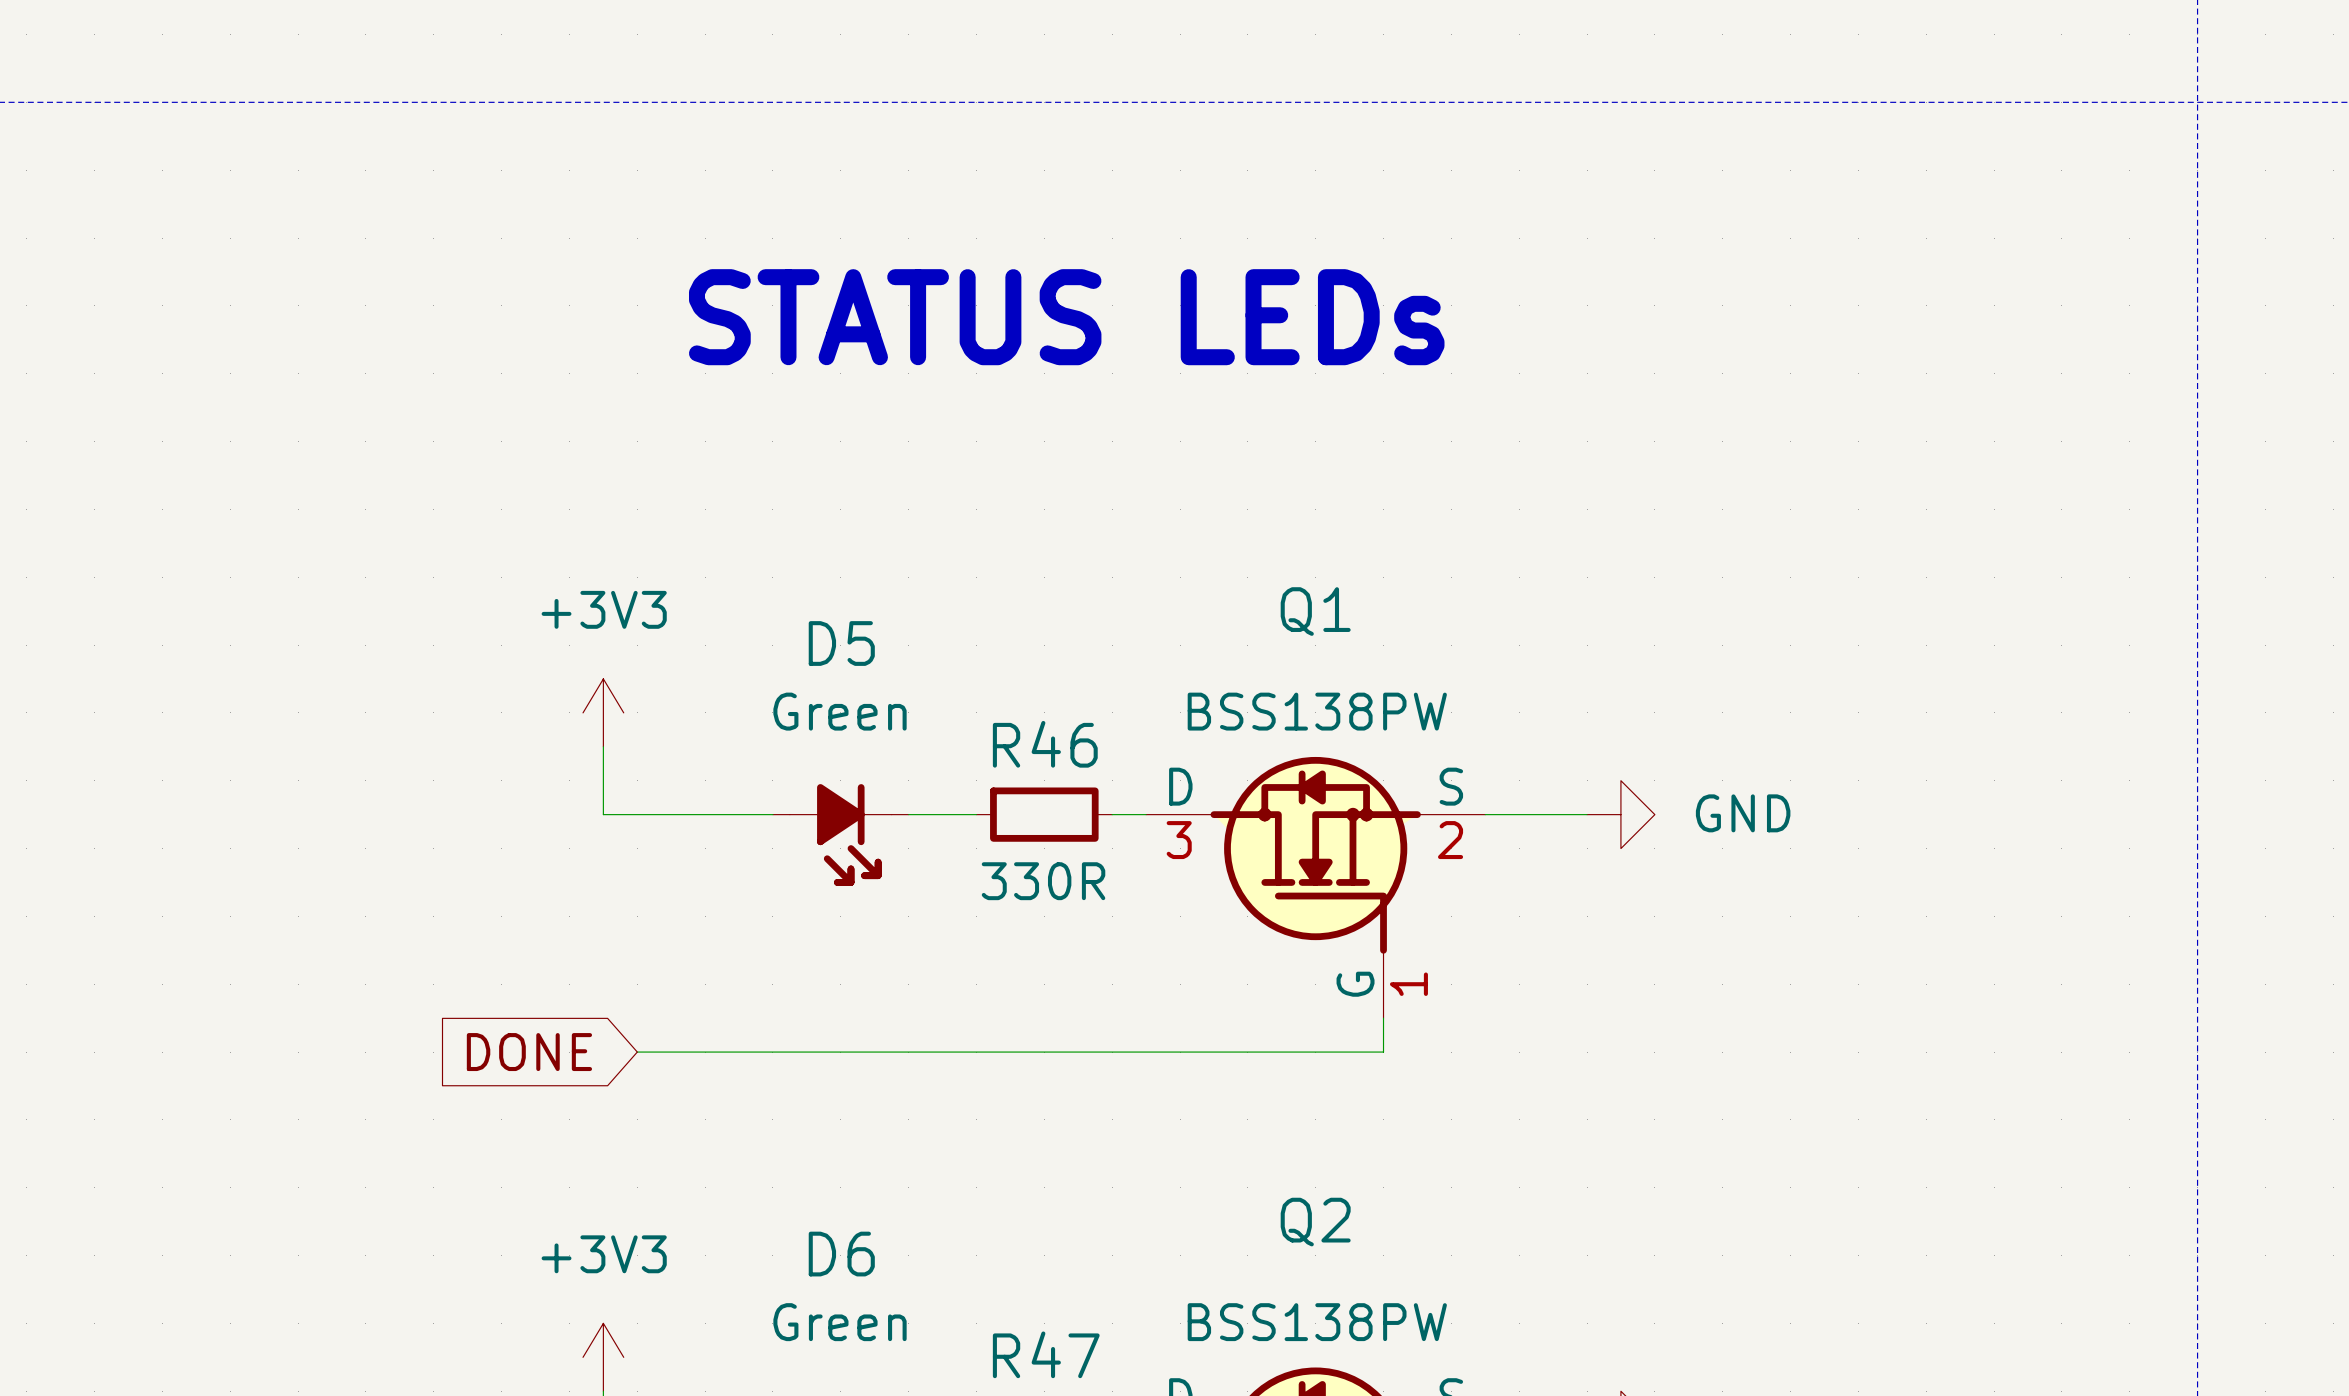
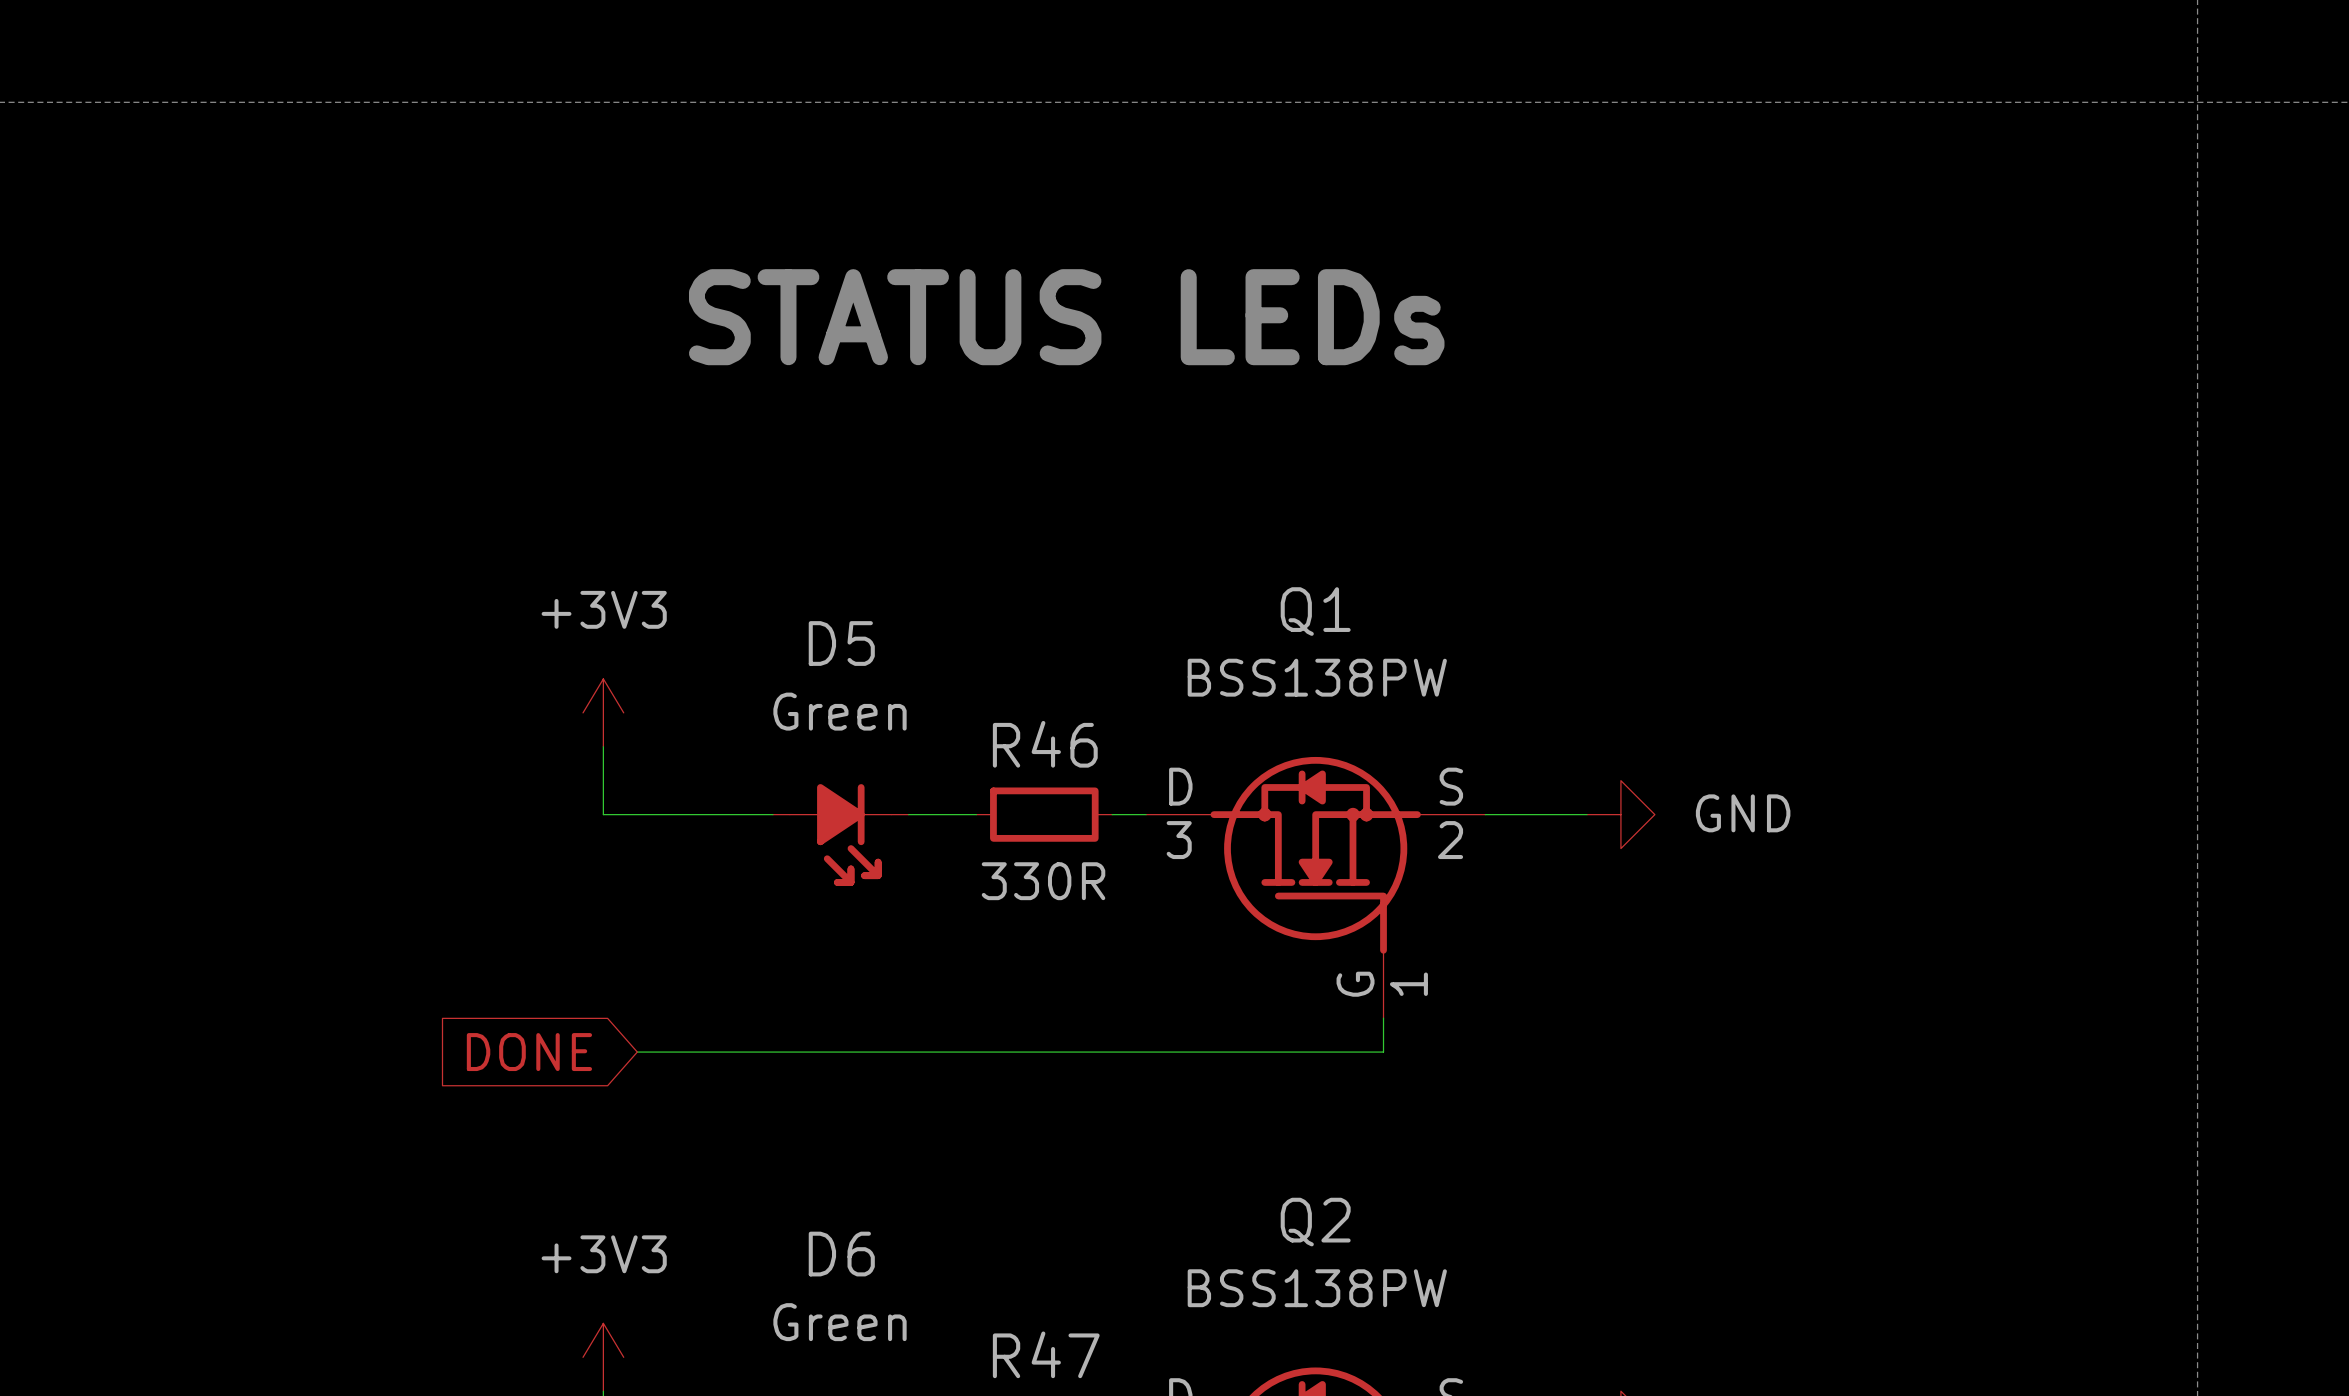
Q1 value position: BSS138PW (1317, 711) -> BSS138PW (1317, 677)
Q2 value position: BSS138PW (1317, 1322) -> BSS138PW (1317, 1288)

